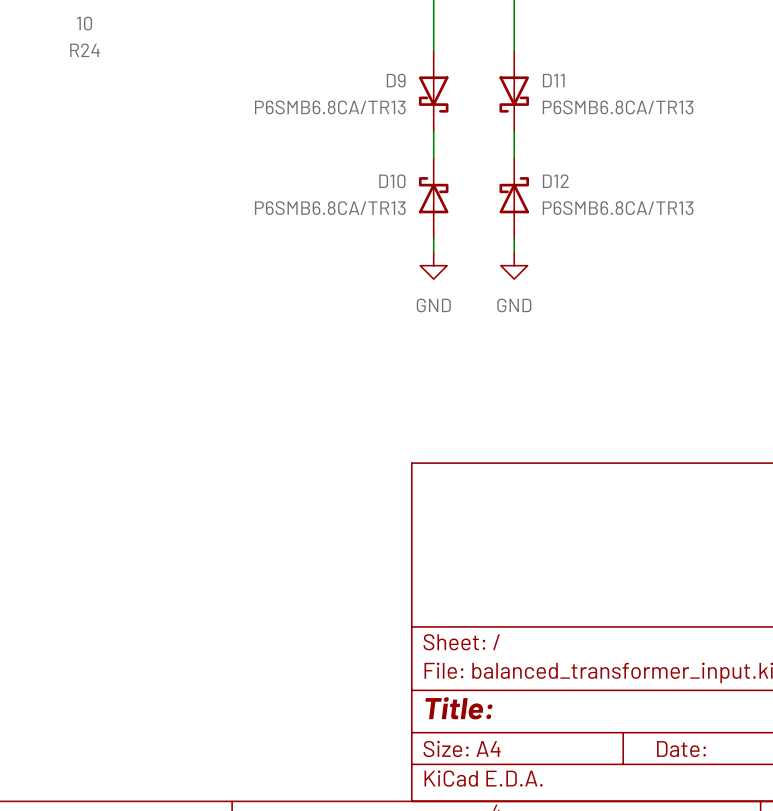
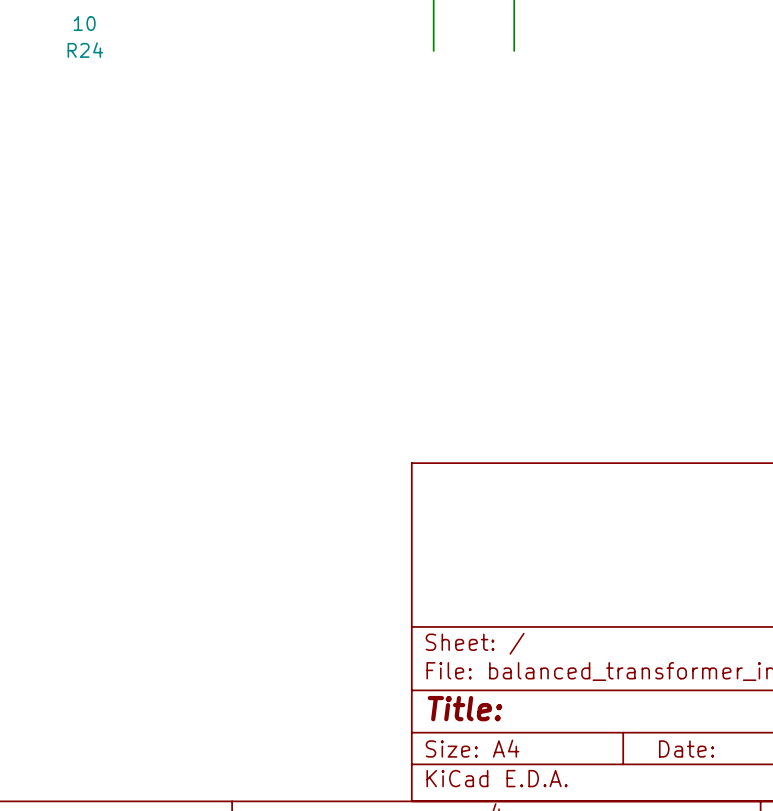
D9: P6SMB6.8CA/TR13 (433, 91) -> none
D11: P6SMB6.8CA/TR13 (514, 91) -> none
wire: (433, 131) (433, 158) -> none
wire: (514, 131) (514, 158) -> none
D10: P6SMB6.8CA/TR13 (433, 198) -> none
D12: P6SMB6.8CA/TR13 (514, 198) -> none
wire: (433, 238) (433, 252) -> none
wire: (514, 238) (514, 252) -> none
power symbol: GND (433, 265) -> none
power symbol: GND (514, 265) -> none

